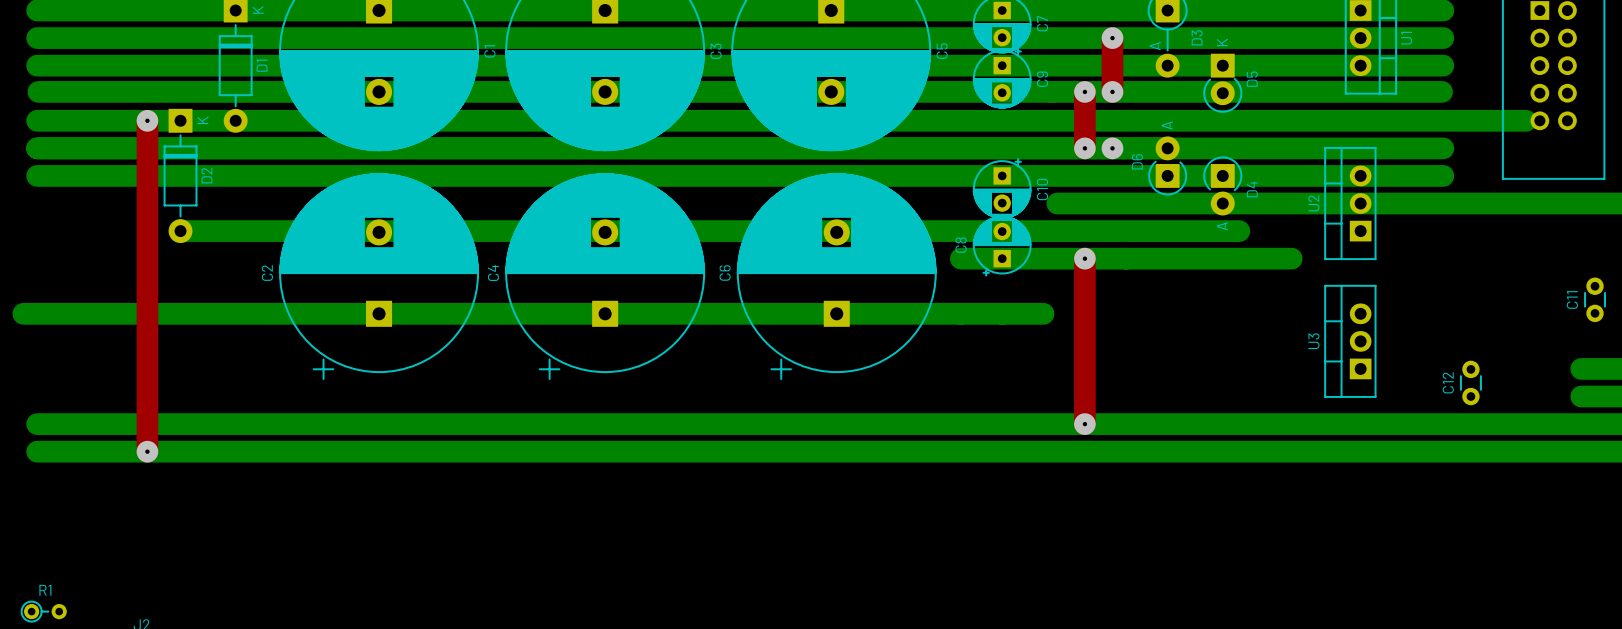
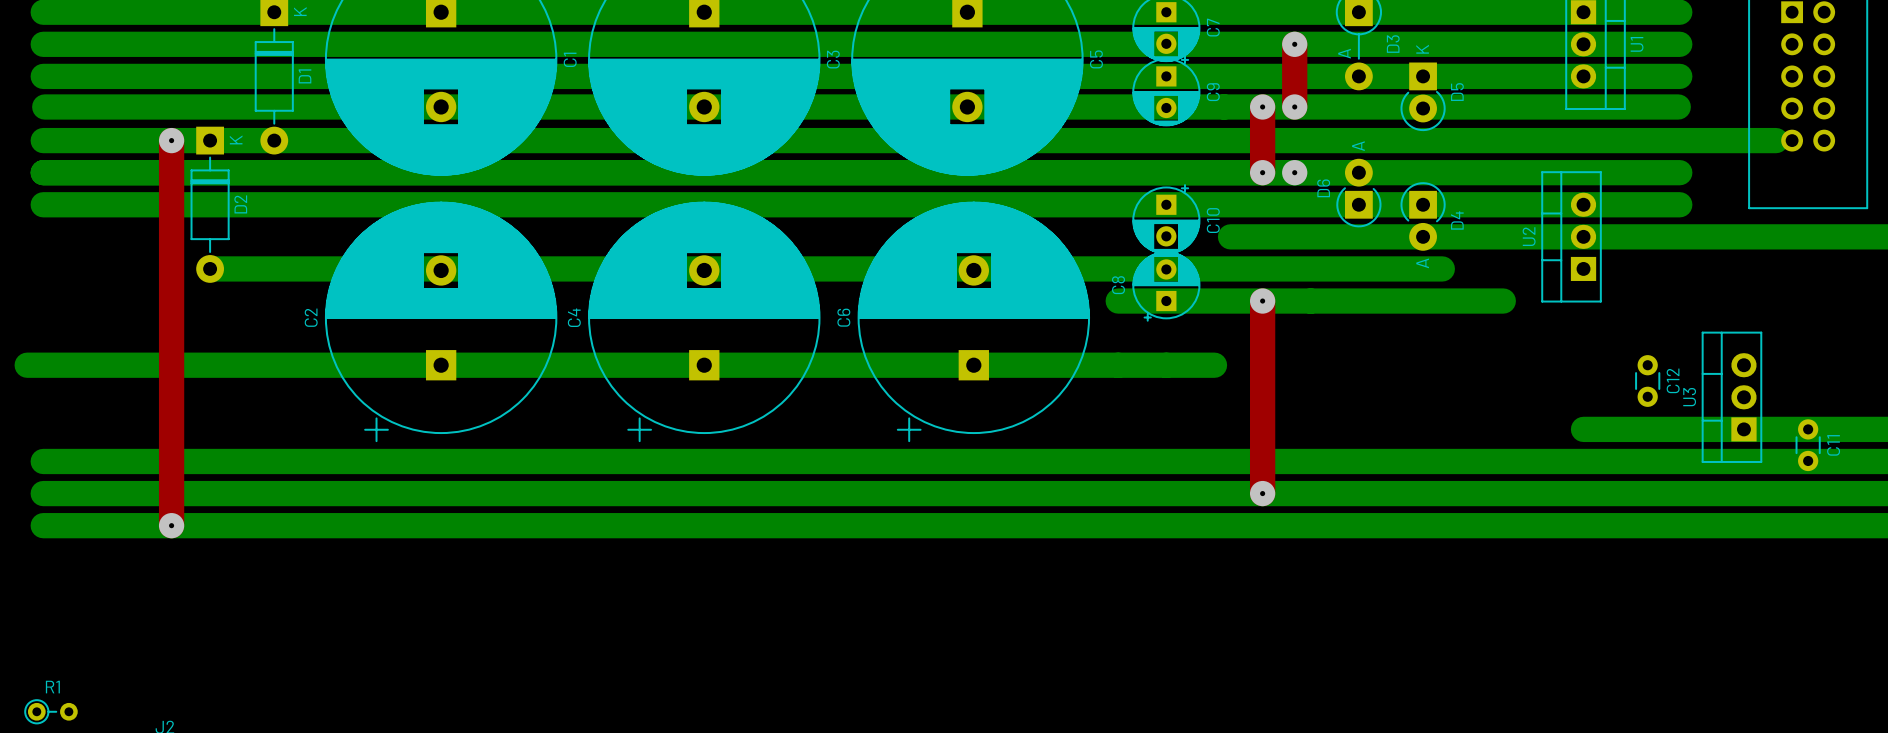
C11 name position: C11 (1572, 299) -> C11 (1833, 445)
C11 position: (1595, 299) -> (1808, 445)
U3 position: (1350, 341) -> (1731, 397)
bottom track: none -> (1583, 429) (1840, 429)
C12 name position: C12 (1448, 382) -> C12 (1673, 380)
C12 position: (1470, 382) -> (1647, 381)
bottom track: none -> (43, 461) (1840, 461)

